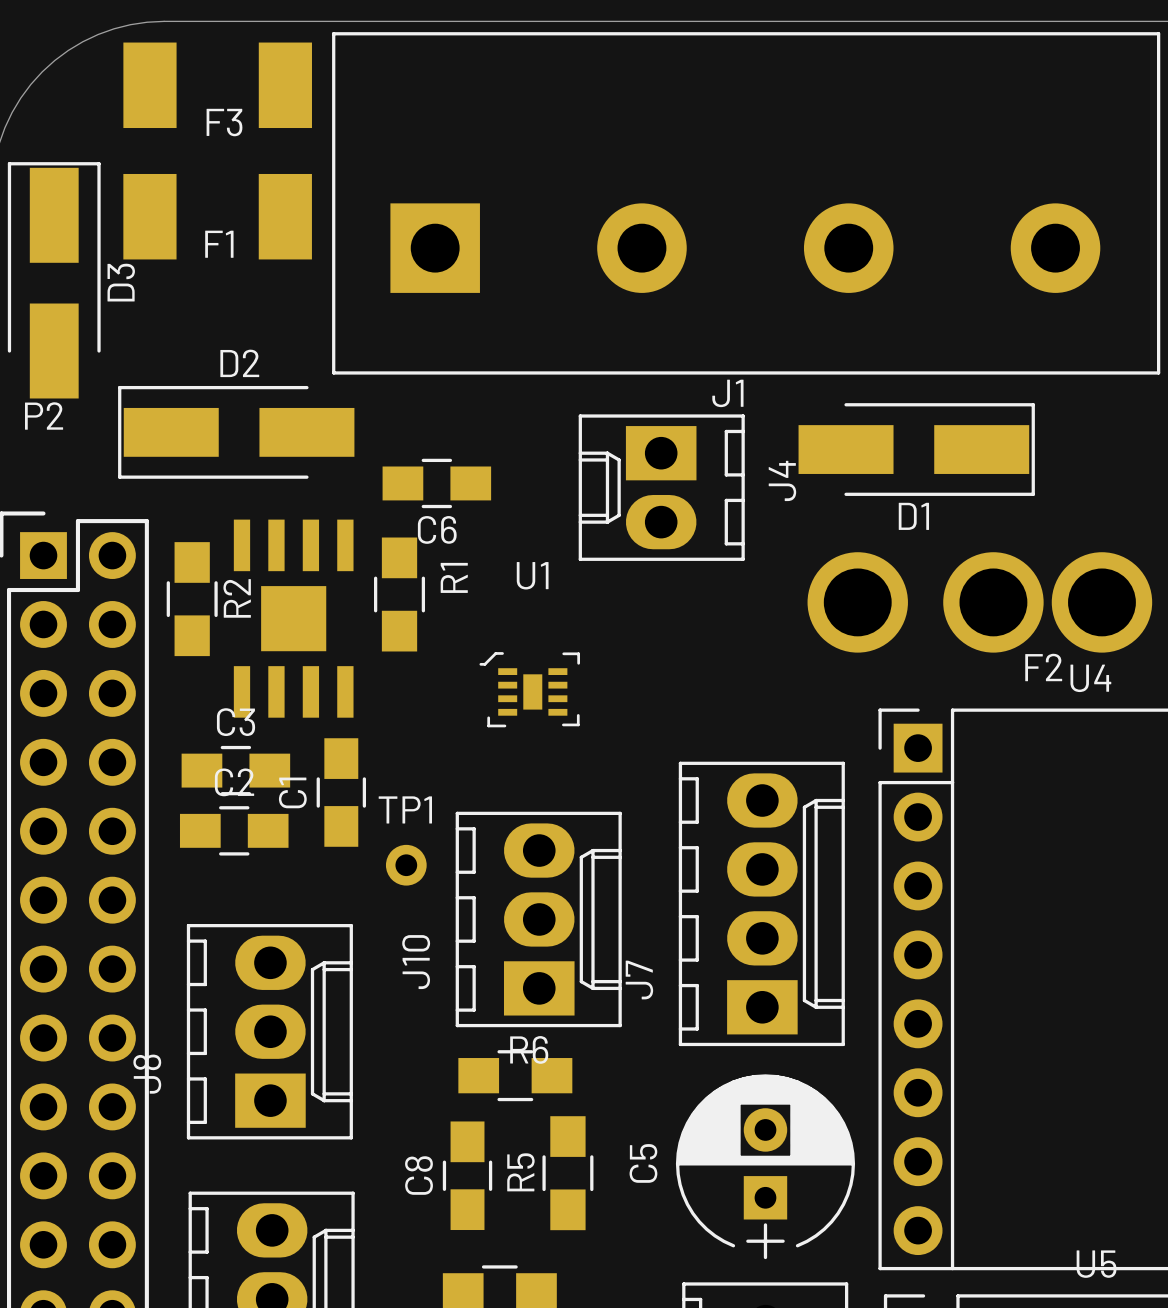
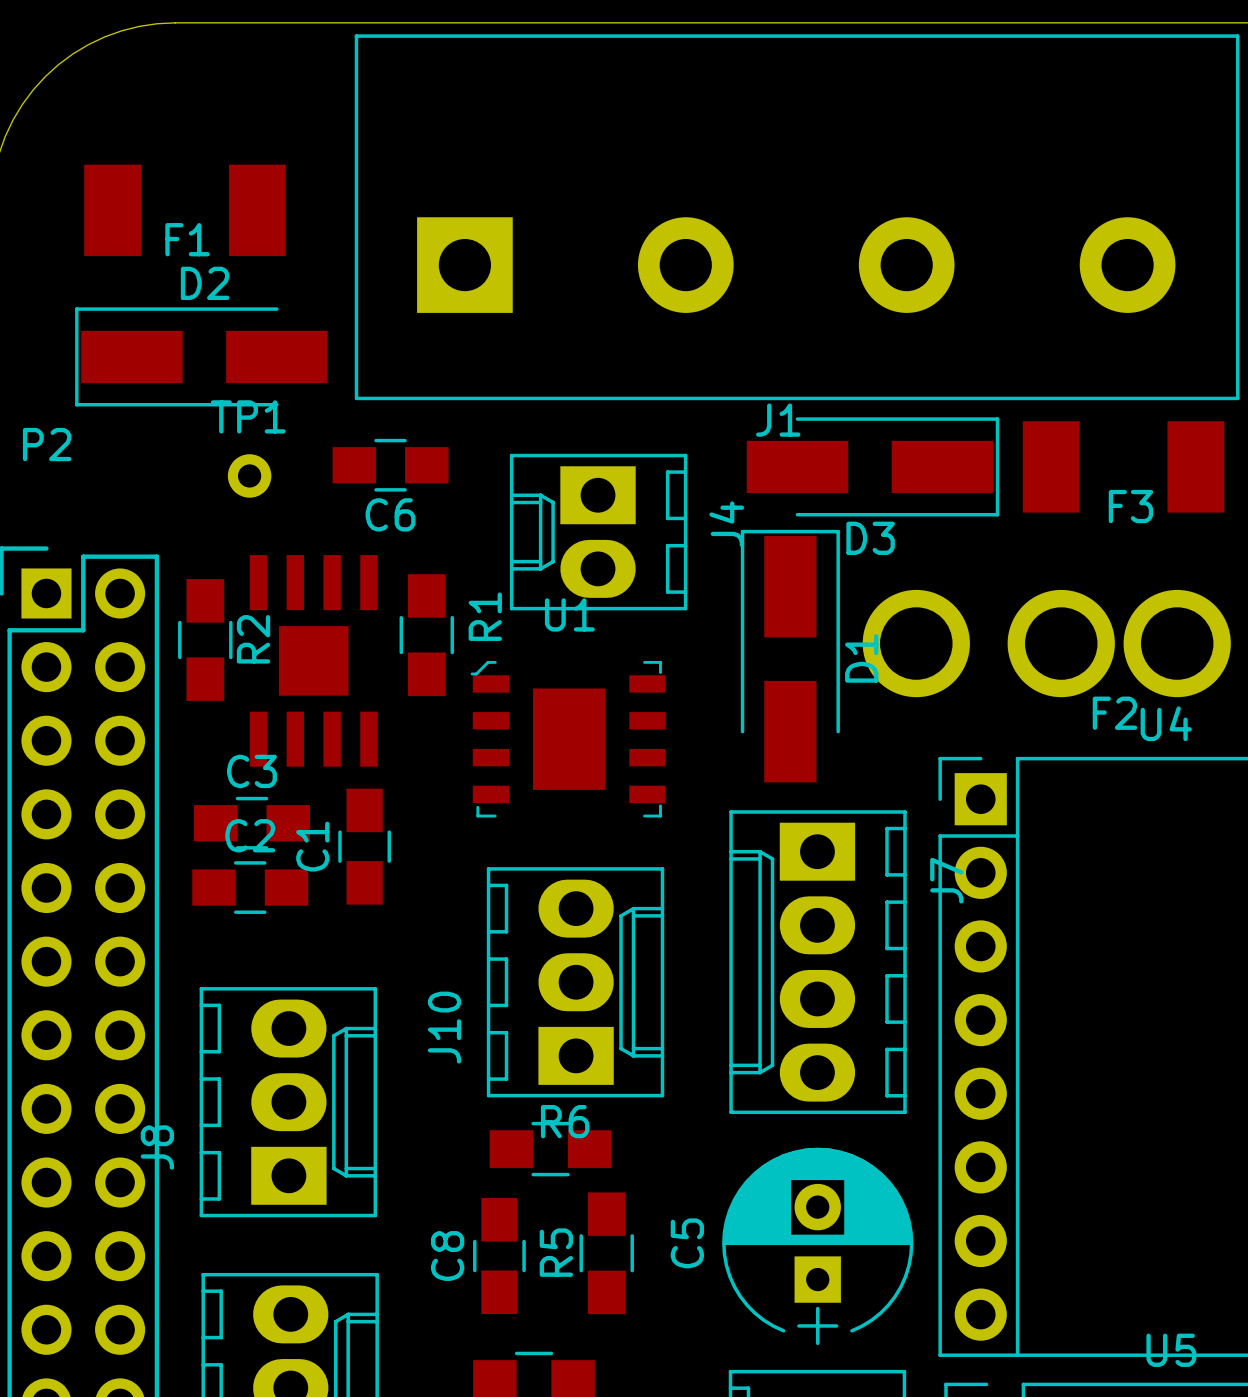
F3 position: (217, 85) -> (1123, 466)
F1 position: (217, 216) -> (184, 210)
D3 rotation: 0° (54, 280) -> 90° clockwise (872, 466)
D3 position: (54, 280) -> (872, 466)
D2 position: (236, 432) -> (201, 356)
D1 rotation: 0° (916, 449) -> 90° counterclockwise (790, 656)
D1 position: (916, 449) -> (790, 656)
C6 position: (436, 483) -> (390, 465)
J4 position: (661, 487) -> (598, 532)
U1 footprint: [479, 652, 580, 728] -> [470, 660, 666, 818]
TP1 position: (406, 865) -> (249, 475)
J7 rotation: 0° (761, 903) -> 180° (818, 962)

